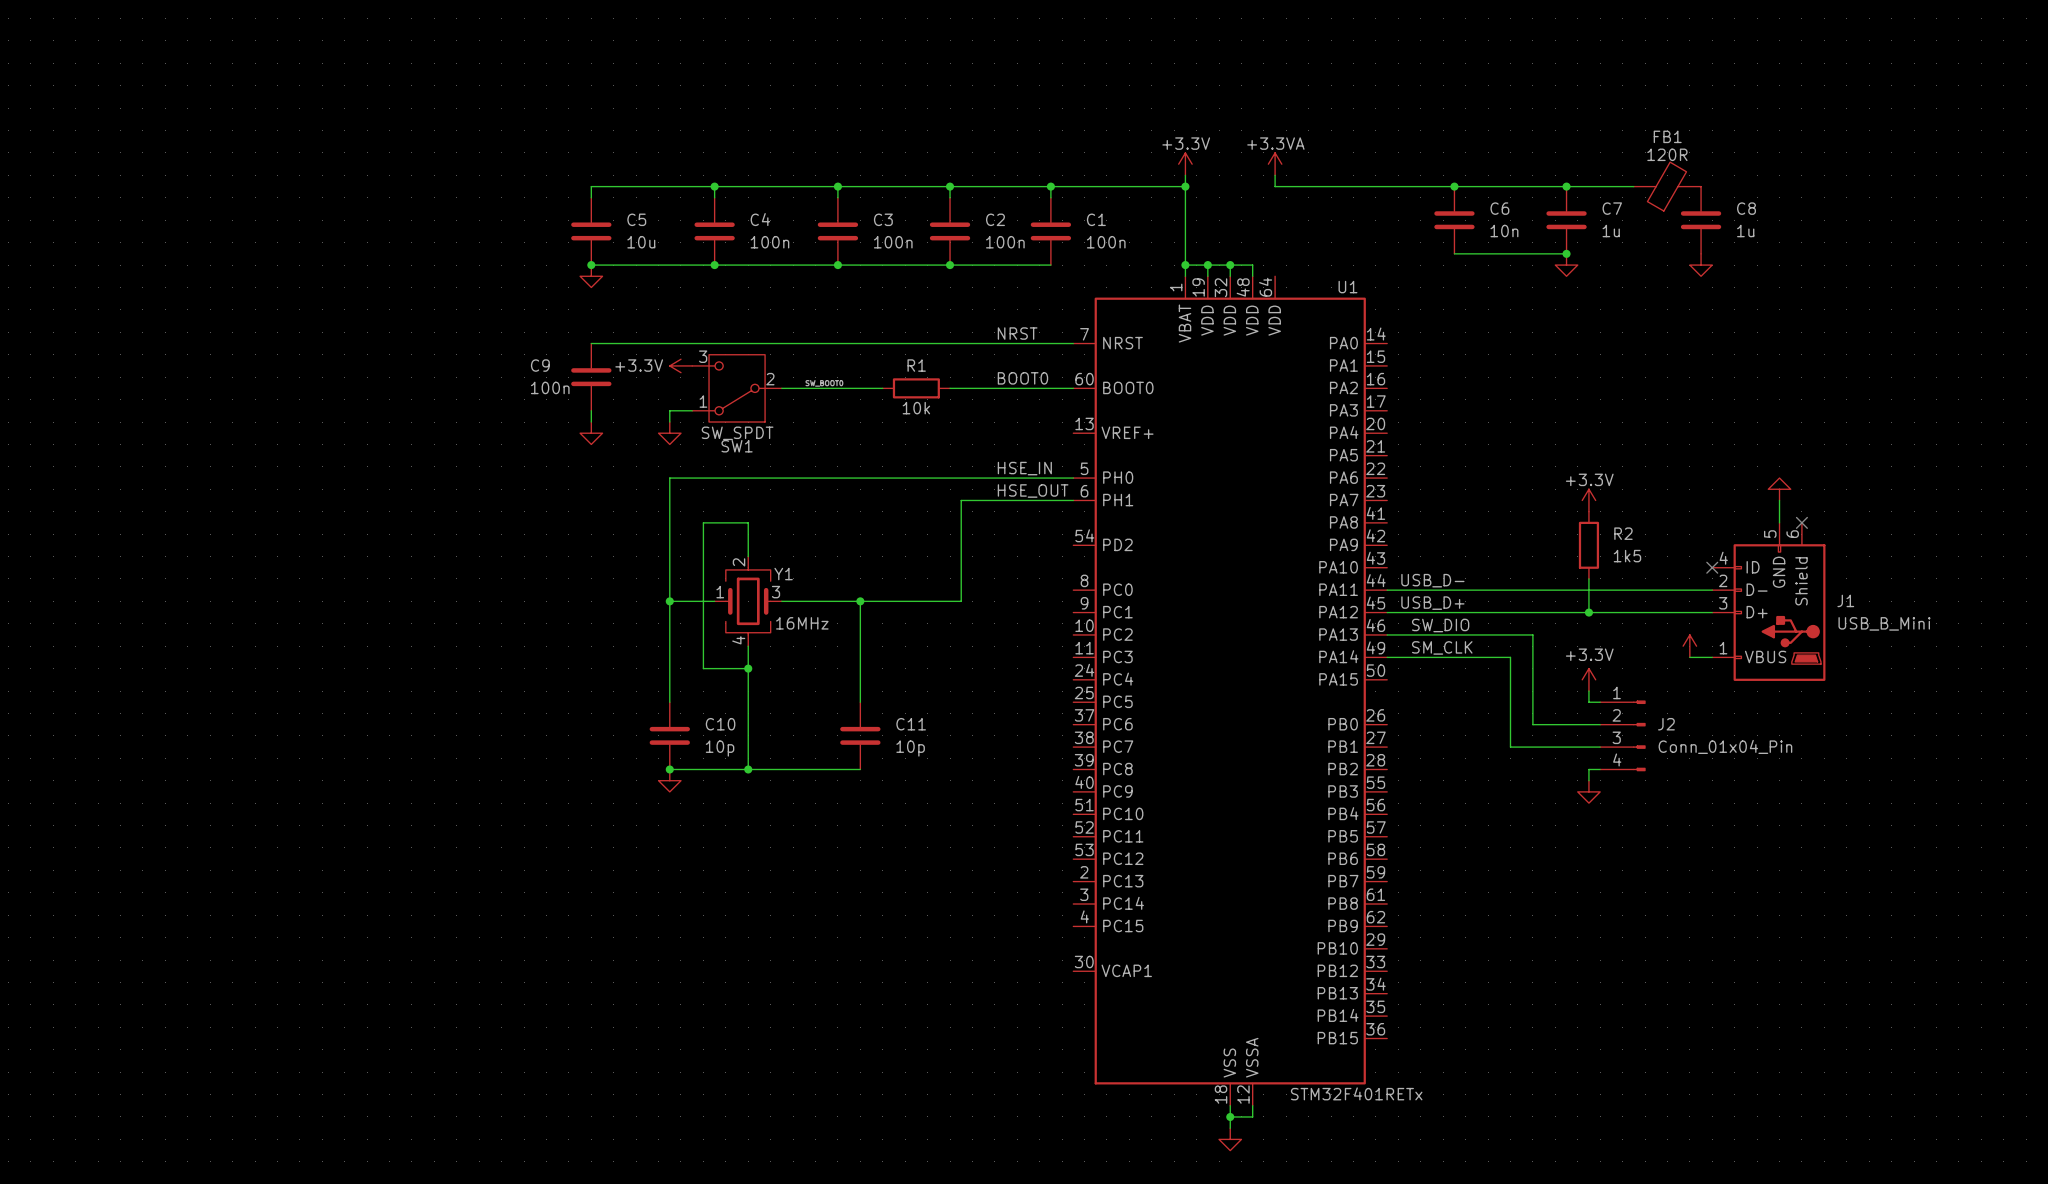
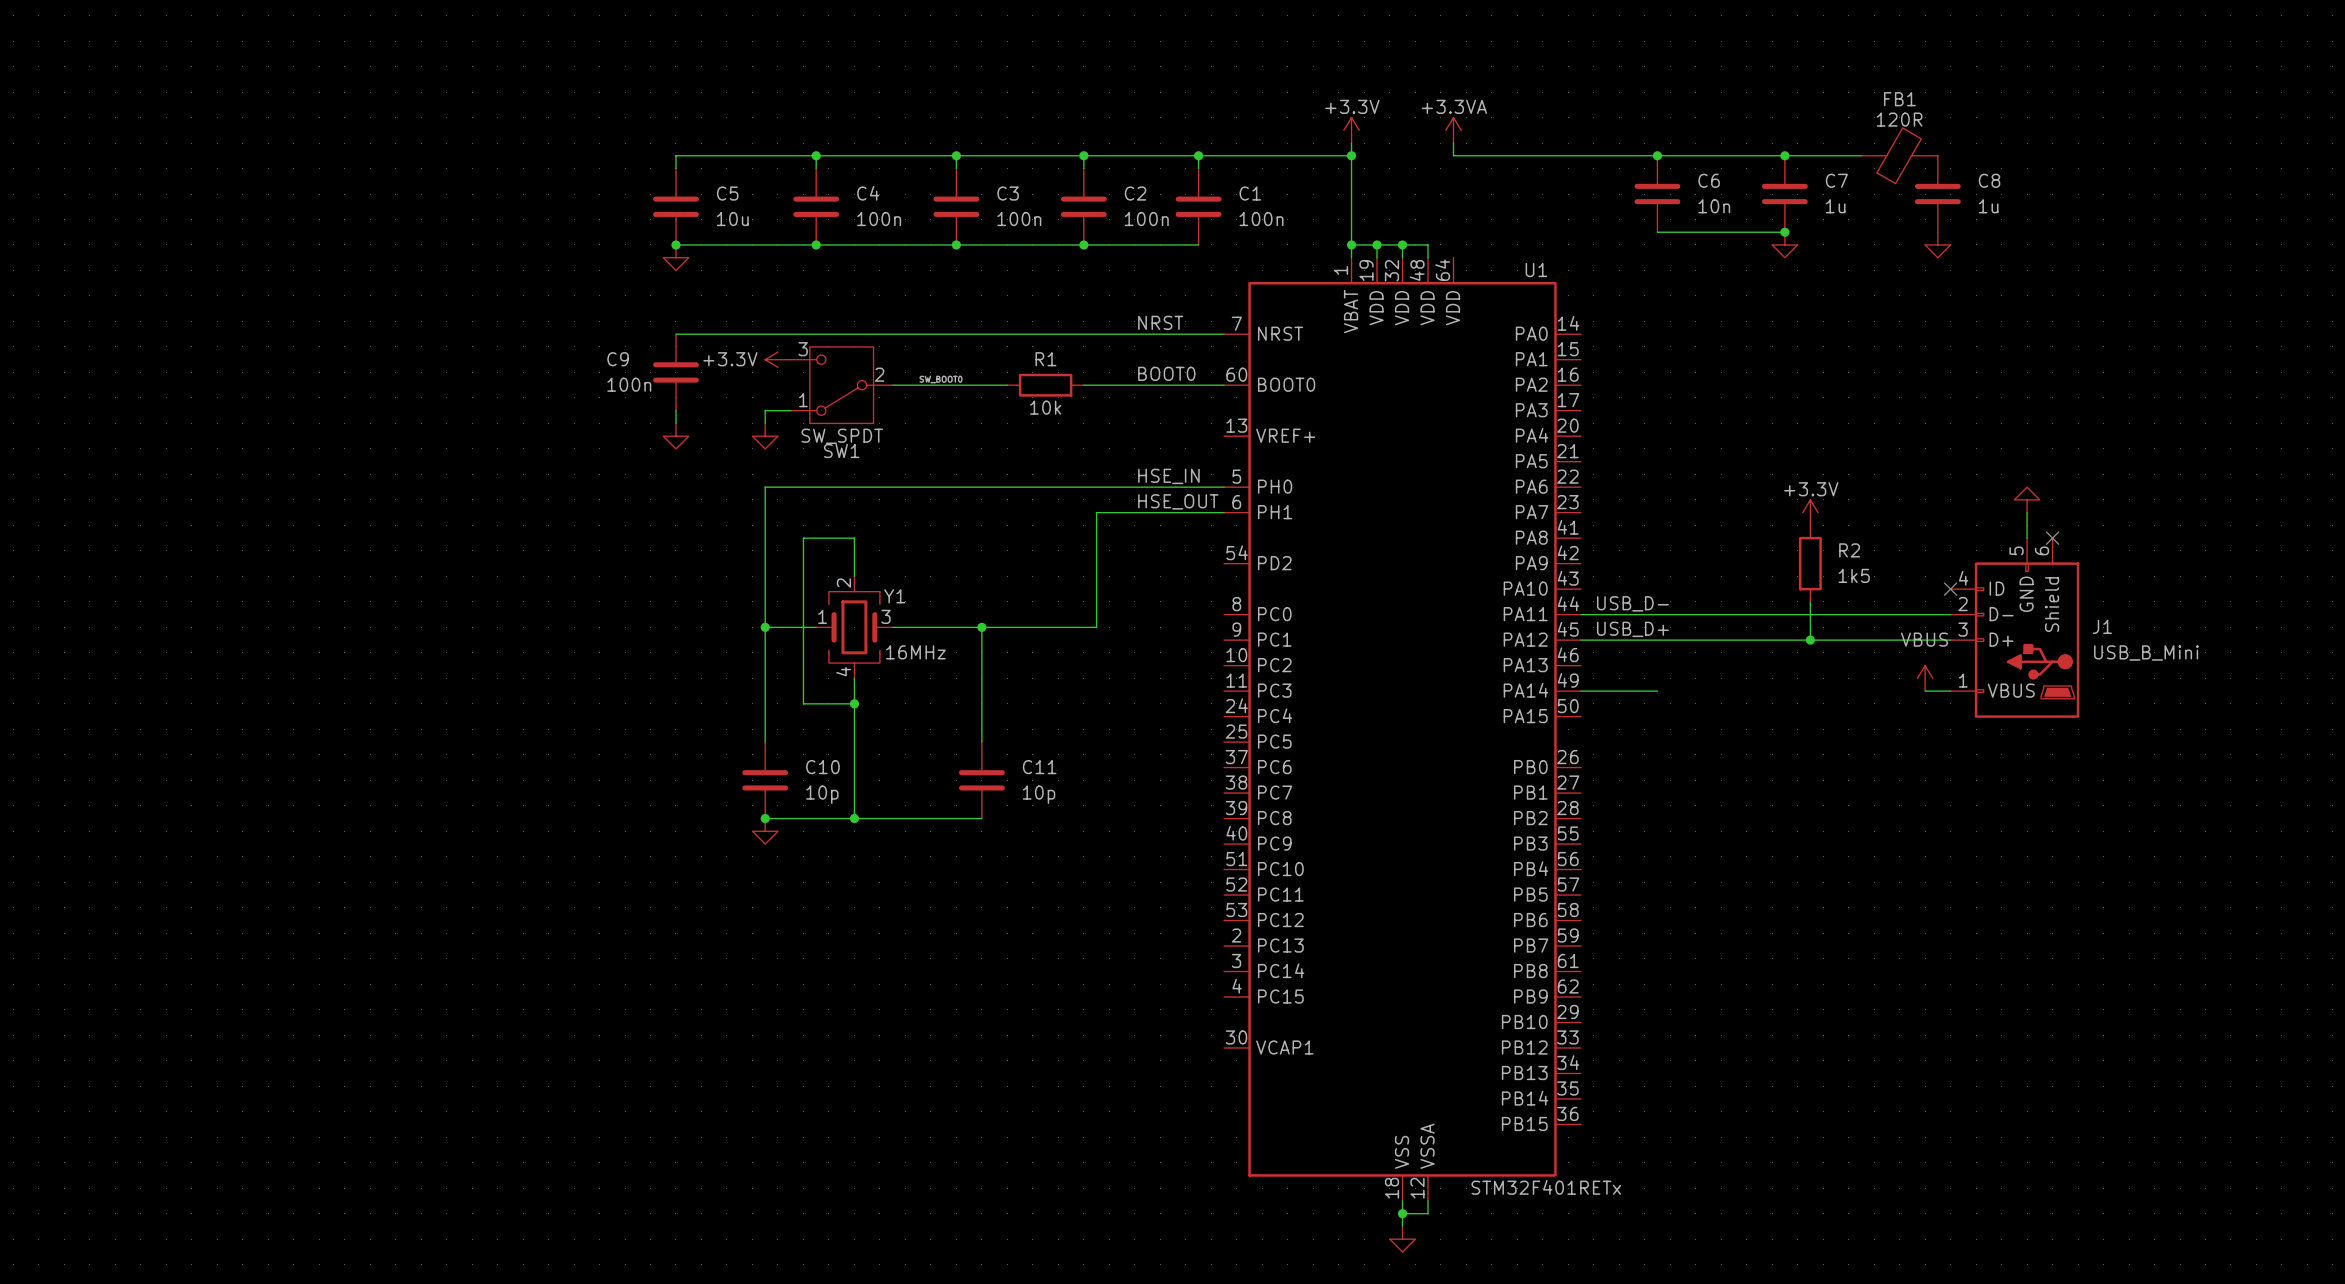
power symbol text: none -> VBUS (1924, 639)
label: SW_DIO (1440, 625) -> none
wire: (1387, 634) (1532, 634) (1532, 724) (1600, 724) -> none
label: SM_CLK (1442, 647) -> none
wire: (1454, 657) (1510, 657) (1510, 747) (1600, 747) -> none
power symbol: +3.3V (1588, 679) -> none
wire: (1588, 691) (1588, 702) (1600, 702) -> none
J2: Conn_01x04_Pin (1622, 735) -> none
wire: (1600, 769) (1588, 769) (1588, 780) -> none
power symbol: (1588, 791) -> none

